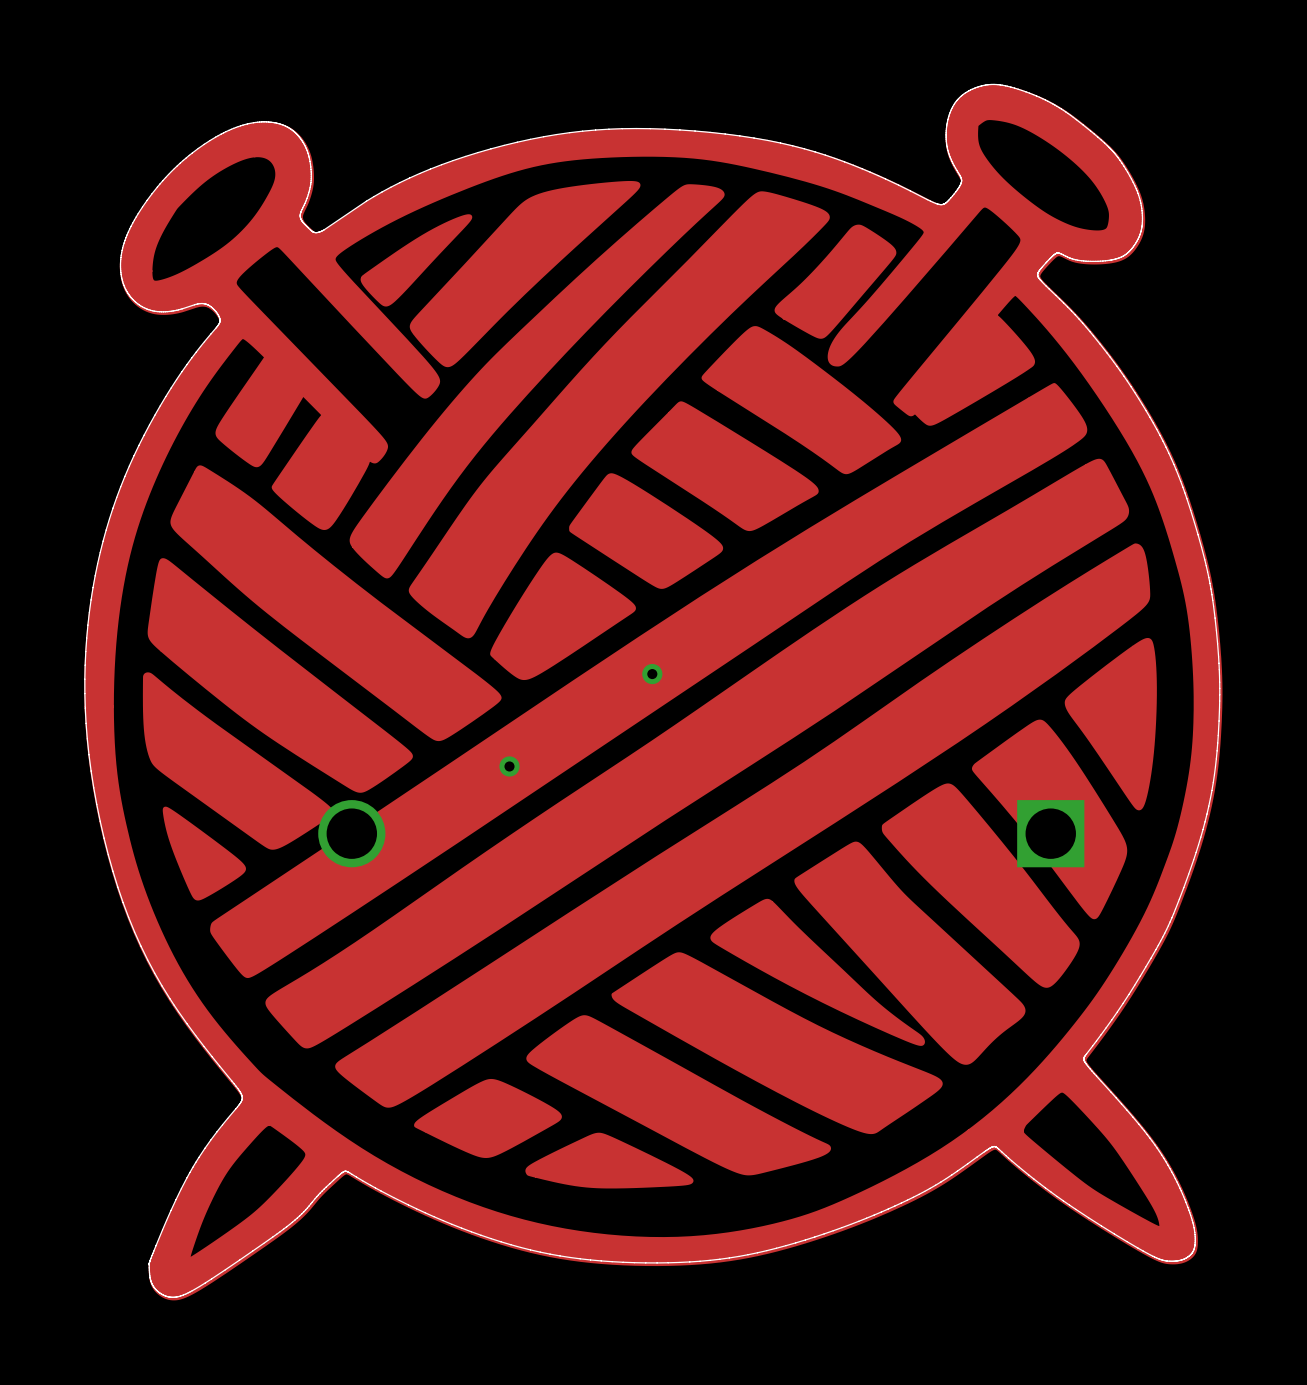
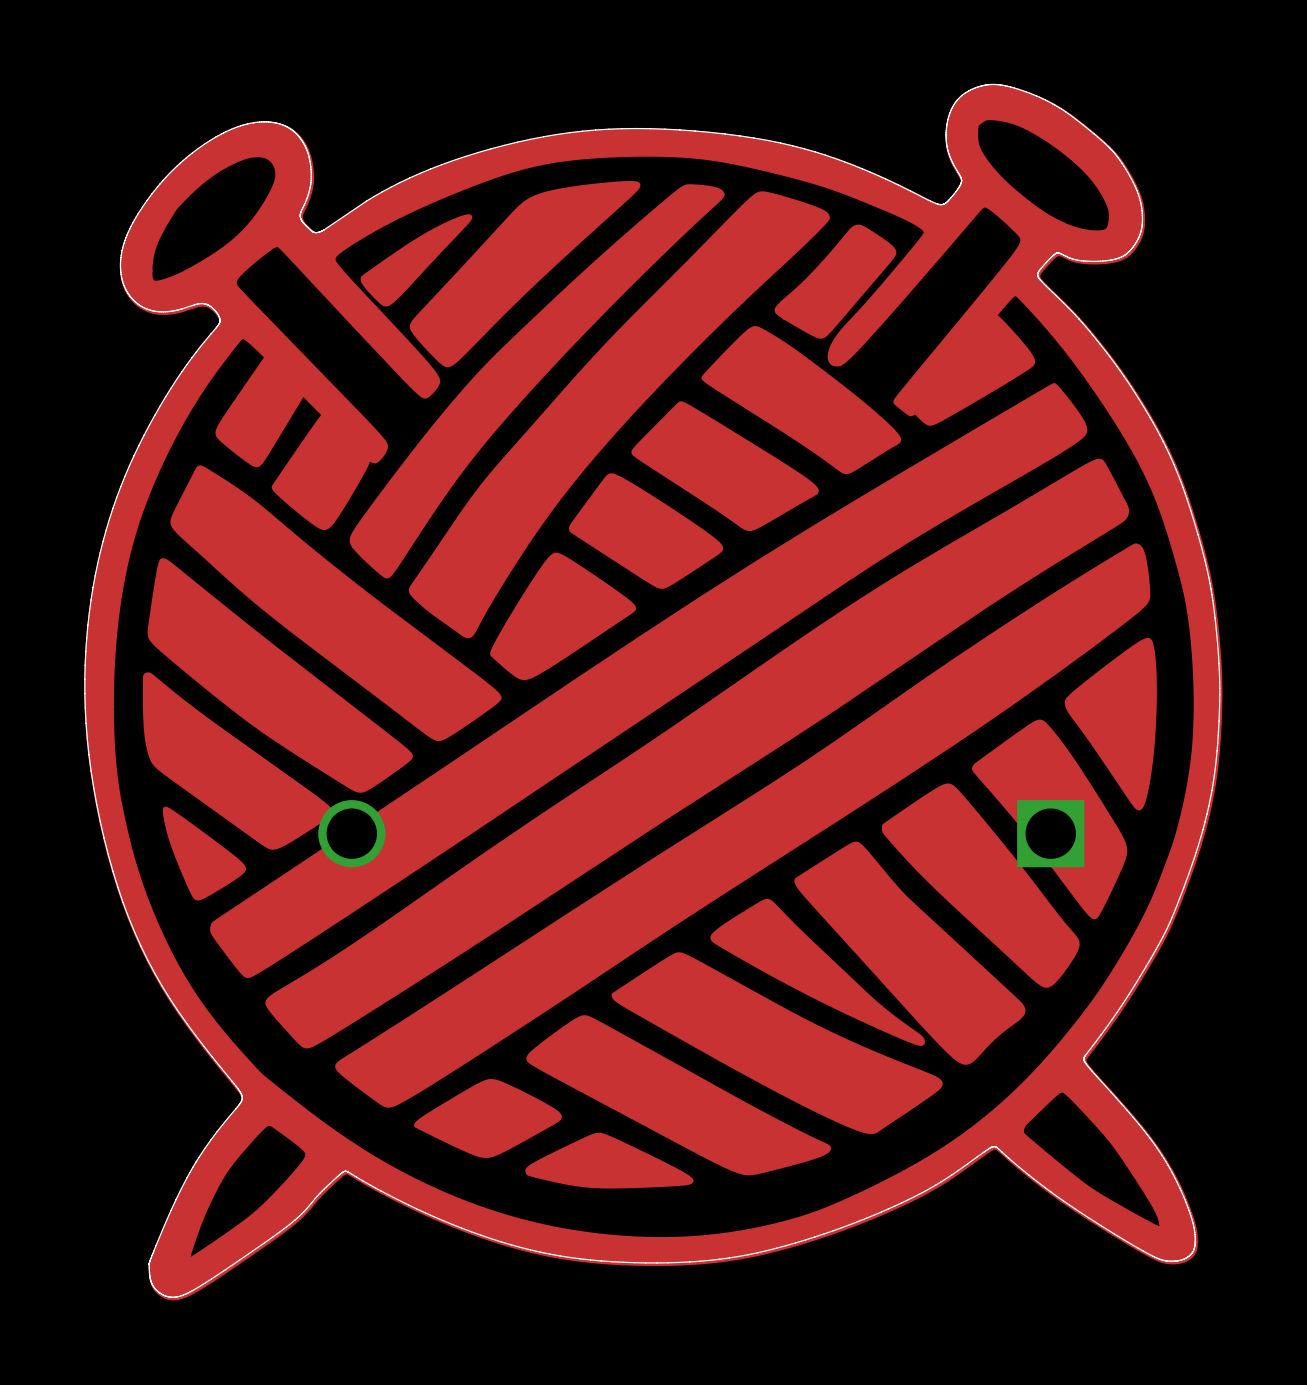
via: (652, 674) -> none
via: (509, 766) -> none

